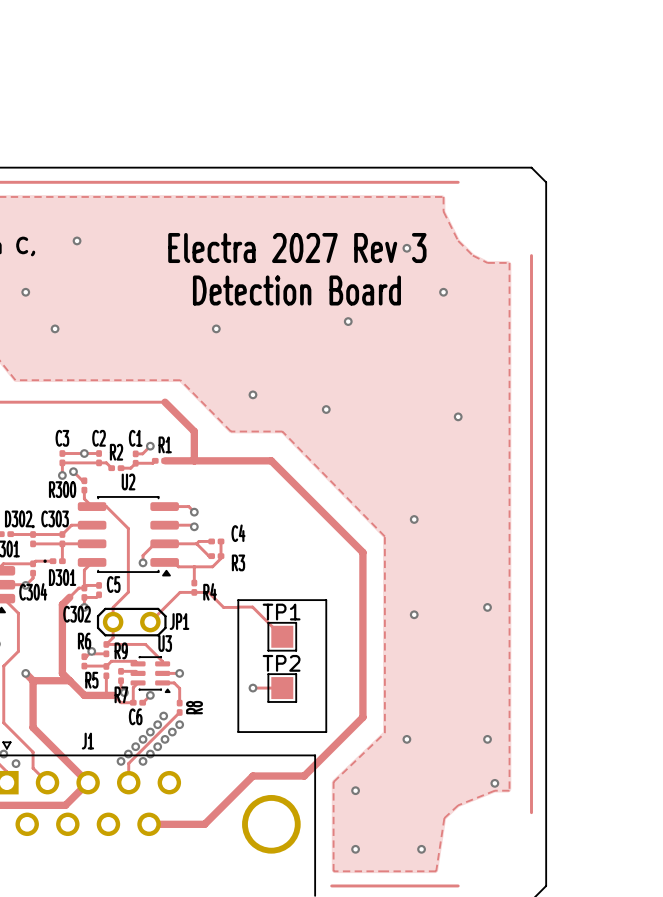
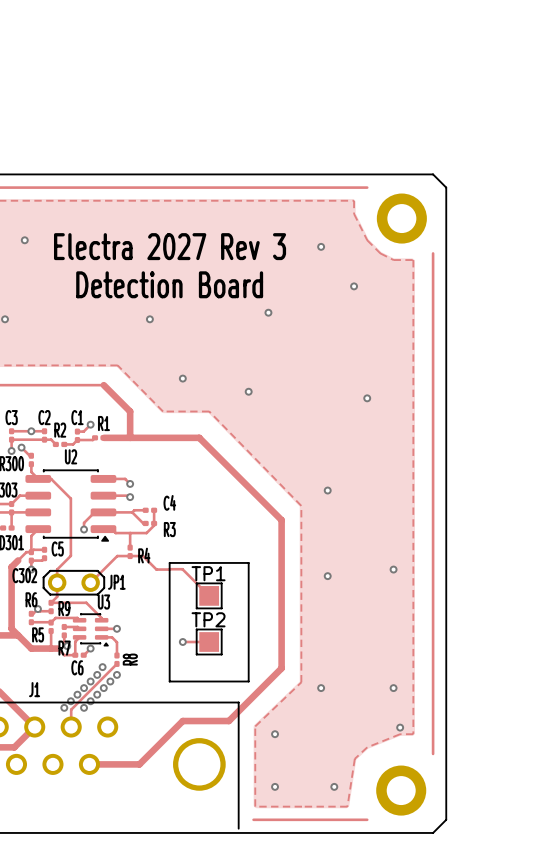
part: none -> (401, 218)
text position: Electra 2027 Rev 3 (297, 248) -> Electra 2027 Rev 3 (170, 246)
text position: Detection Board (296, 290) -> Detection Board (169, 284)
part: none -> (401, 790)

